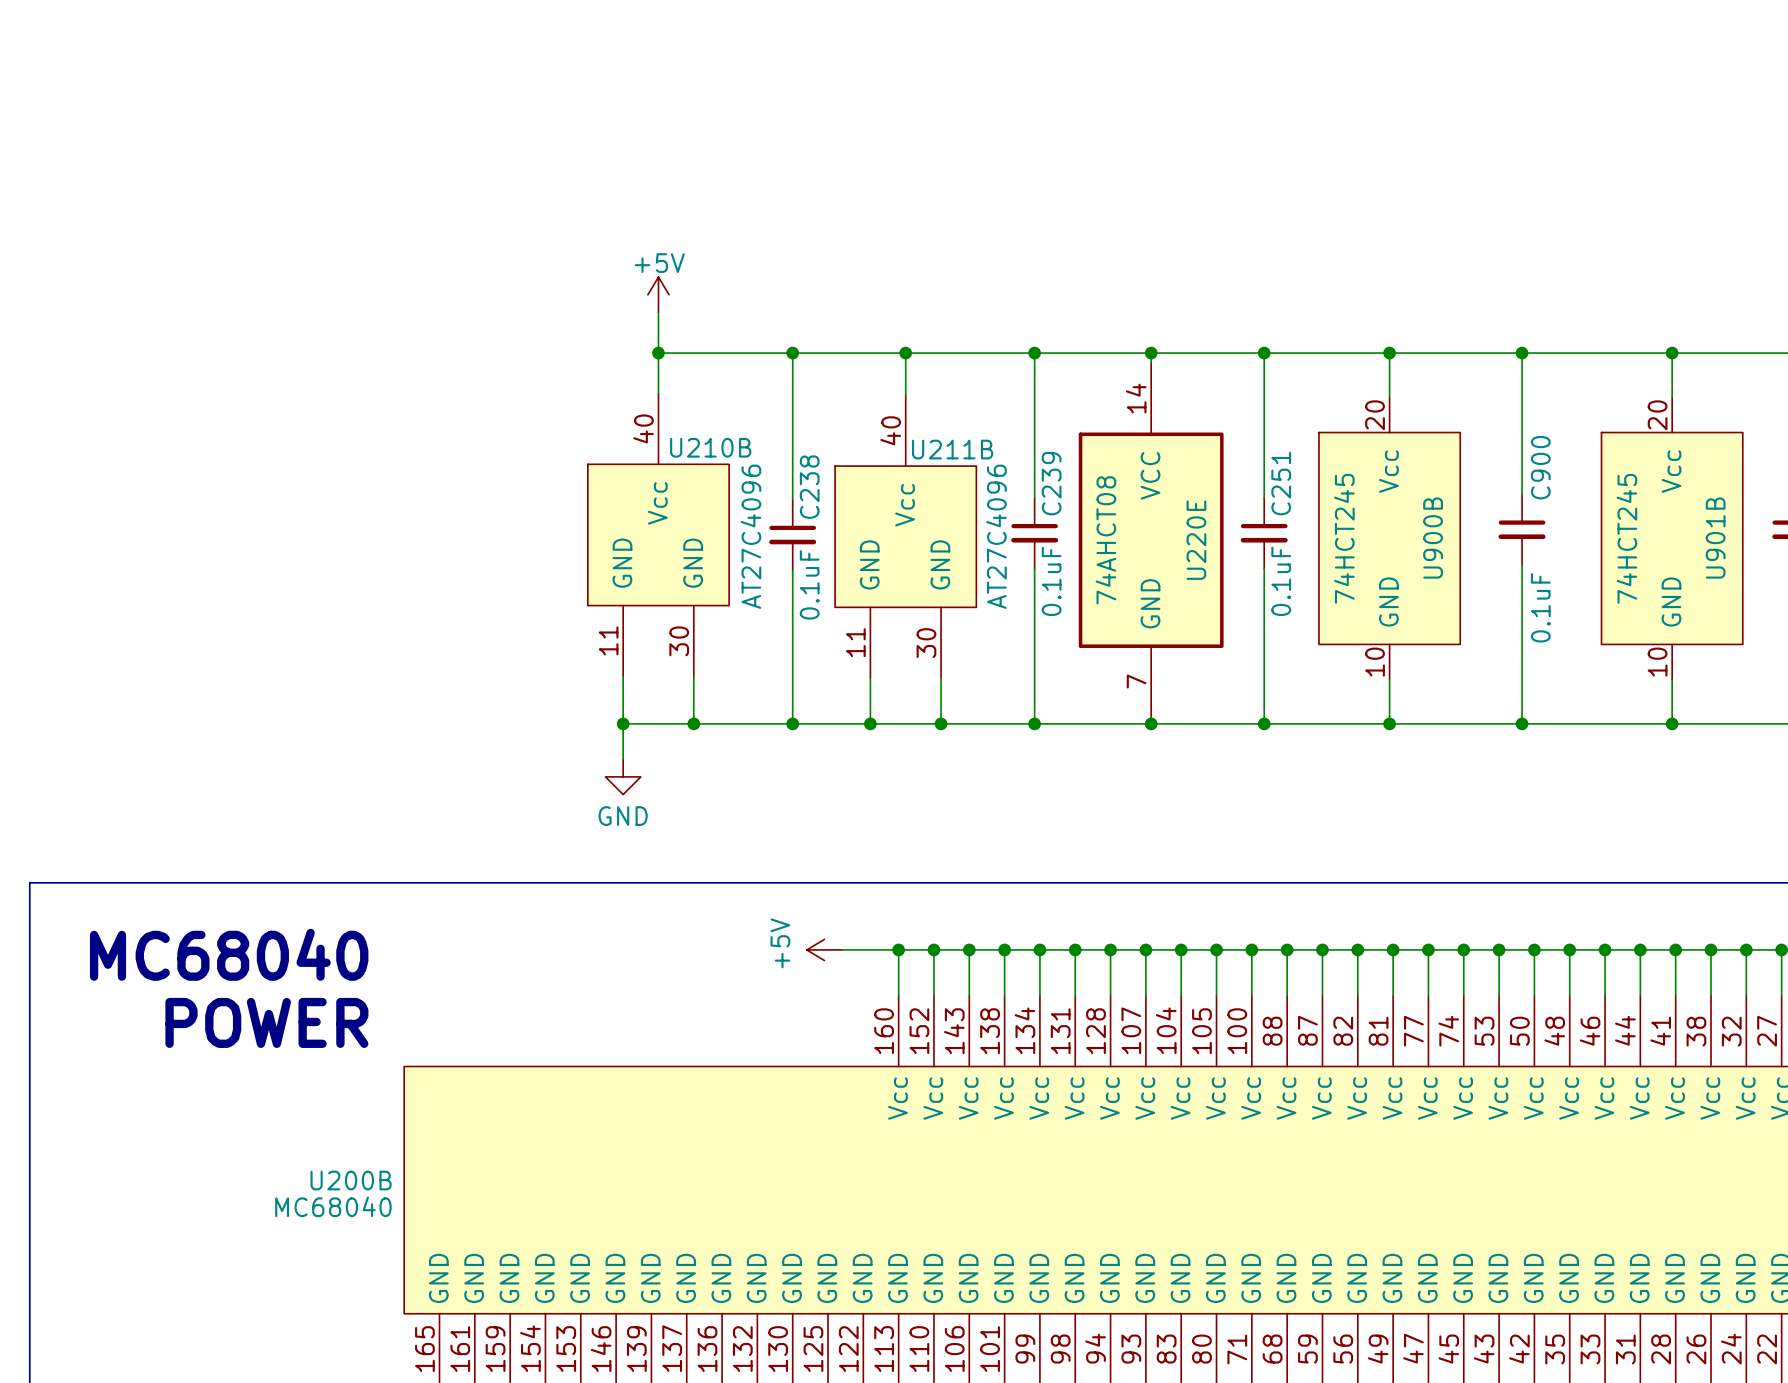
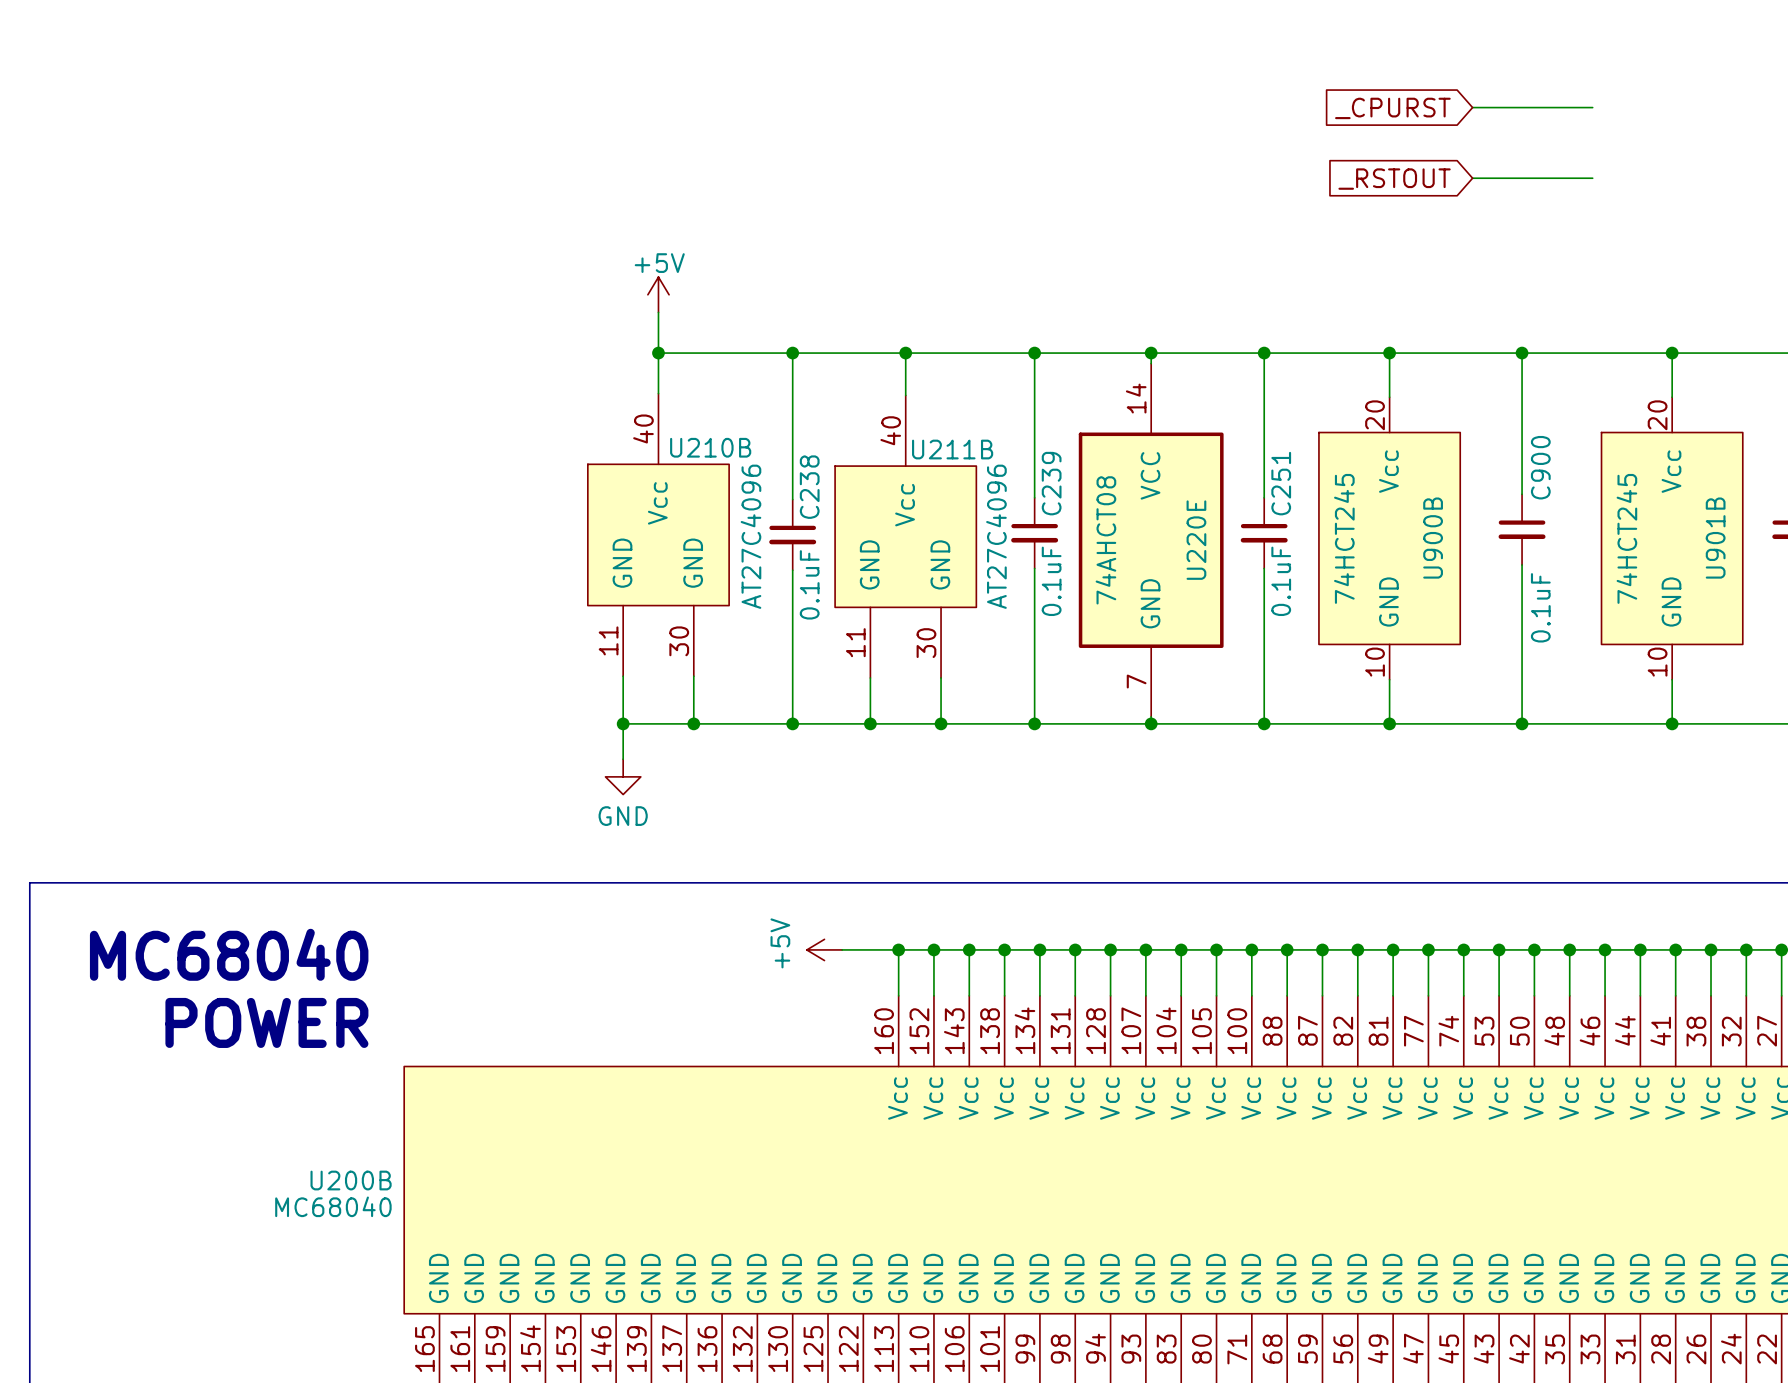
wire: none -> (1472, 107) (1592, 107)
global label: none -> _CPURST (1392, 108)
wire: none -> (1472, 178) (1592, 178)
global label: none -> _RSTOUT (1394, 179)

